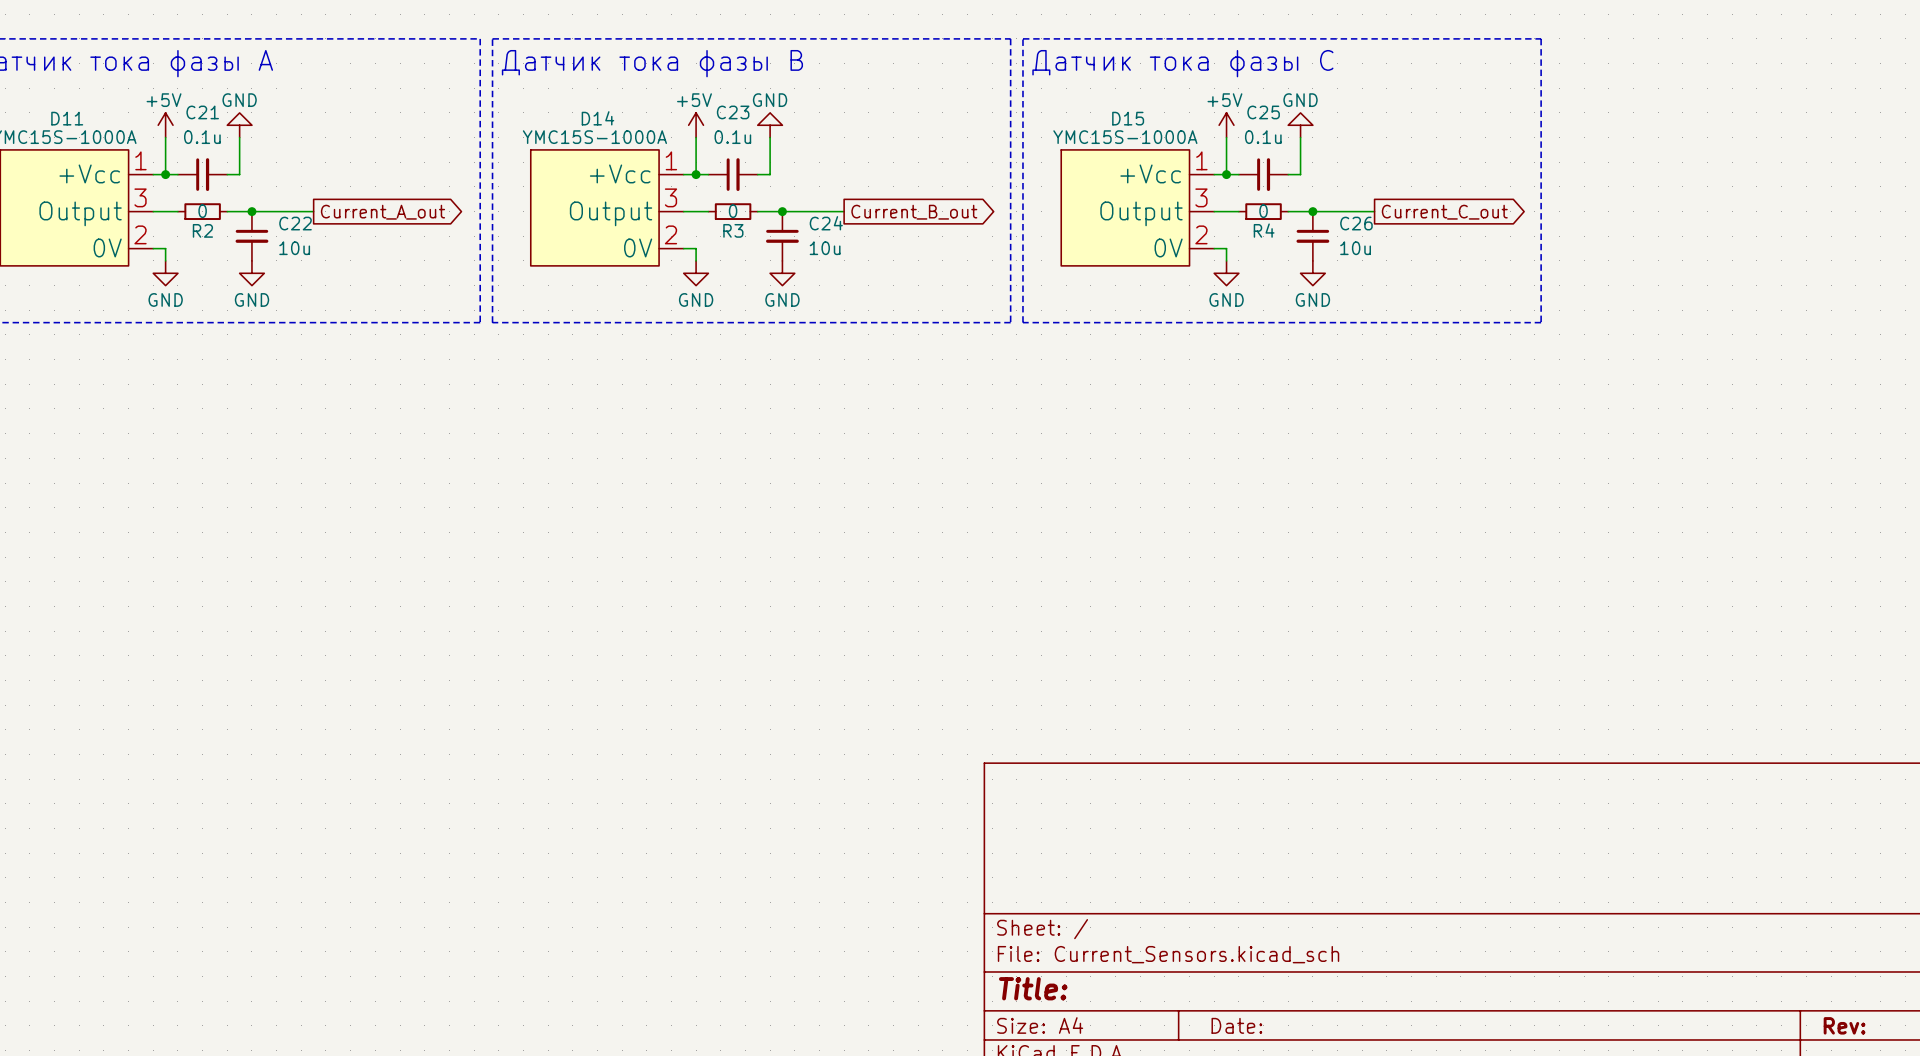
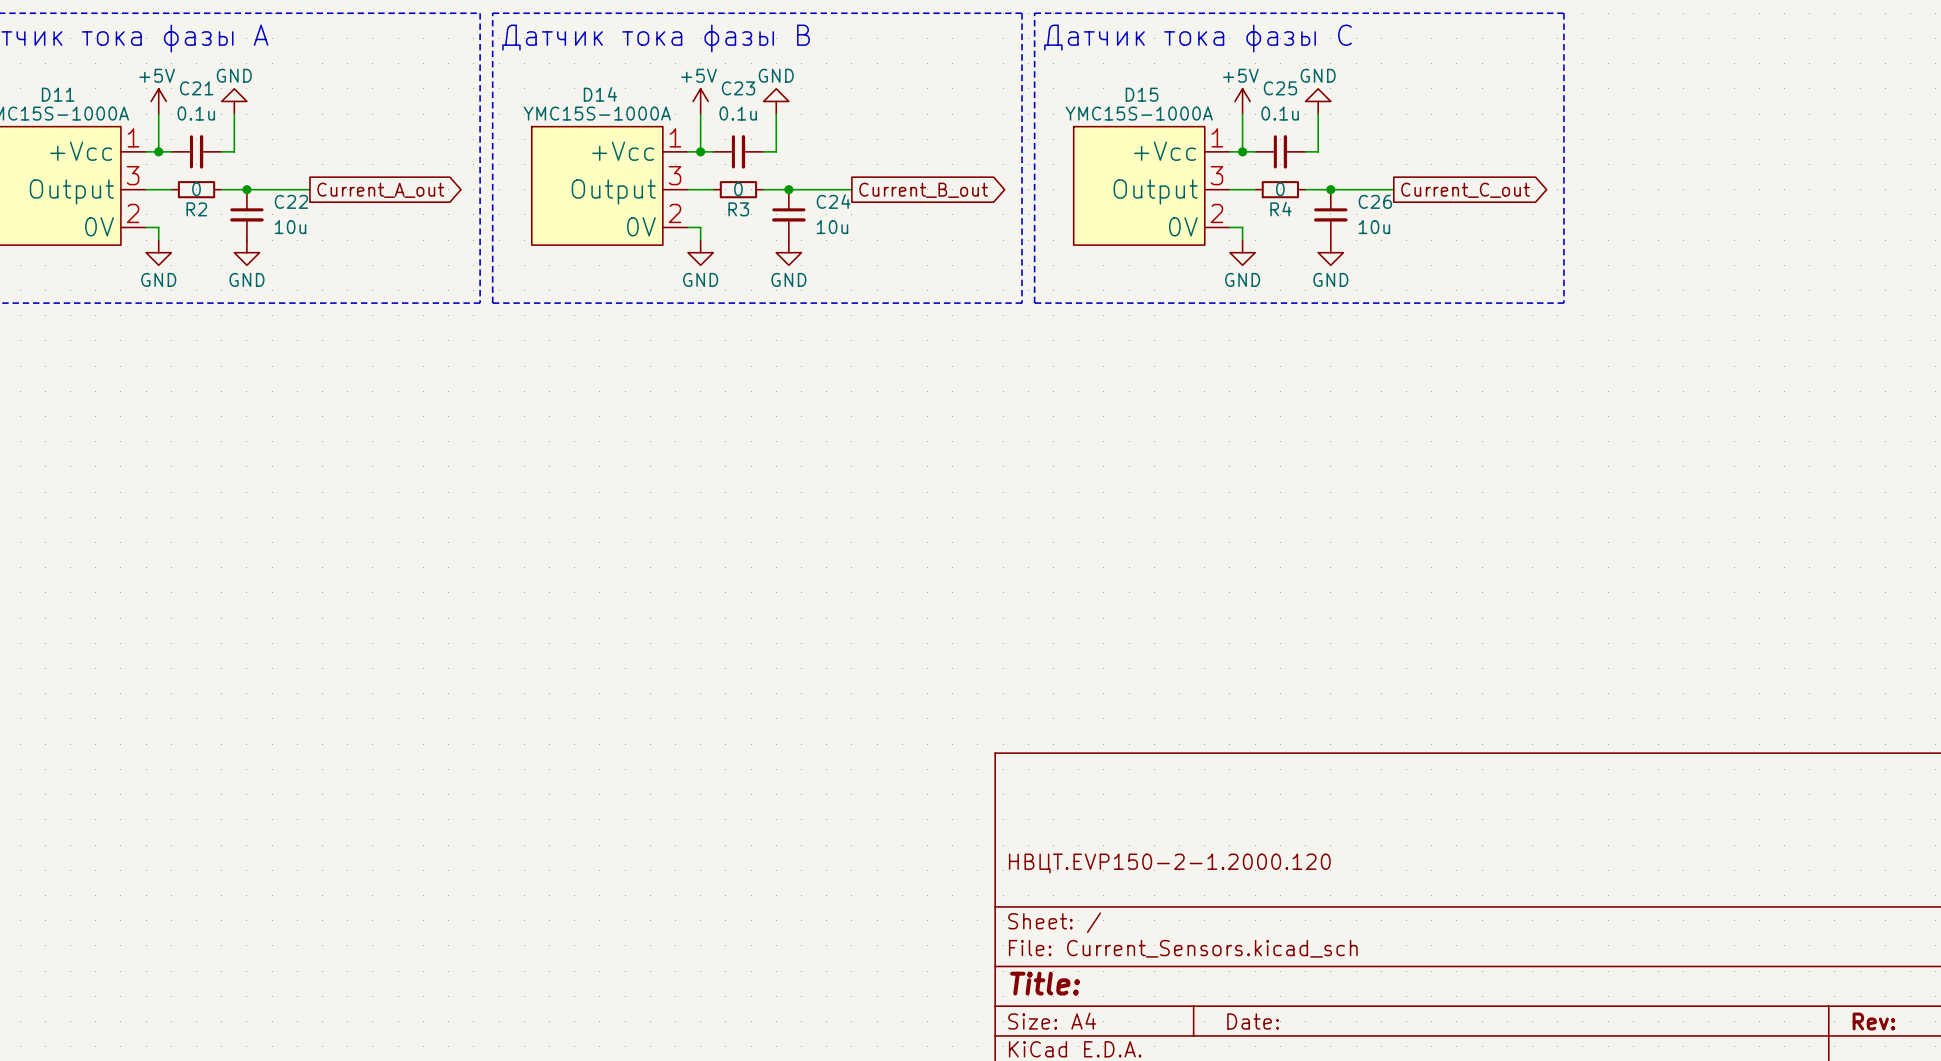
title block: none -> НВЦТ.EVP150-2-1.2000.120 (1169, 863)

